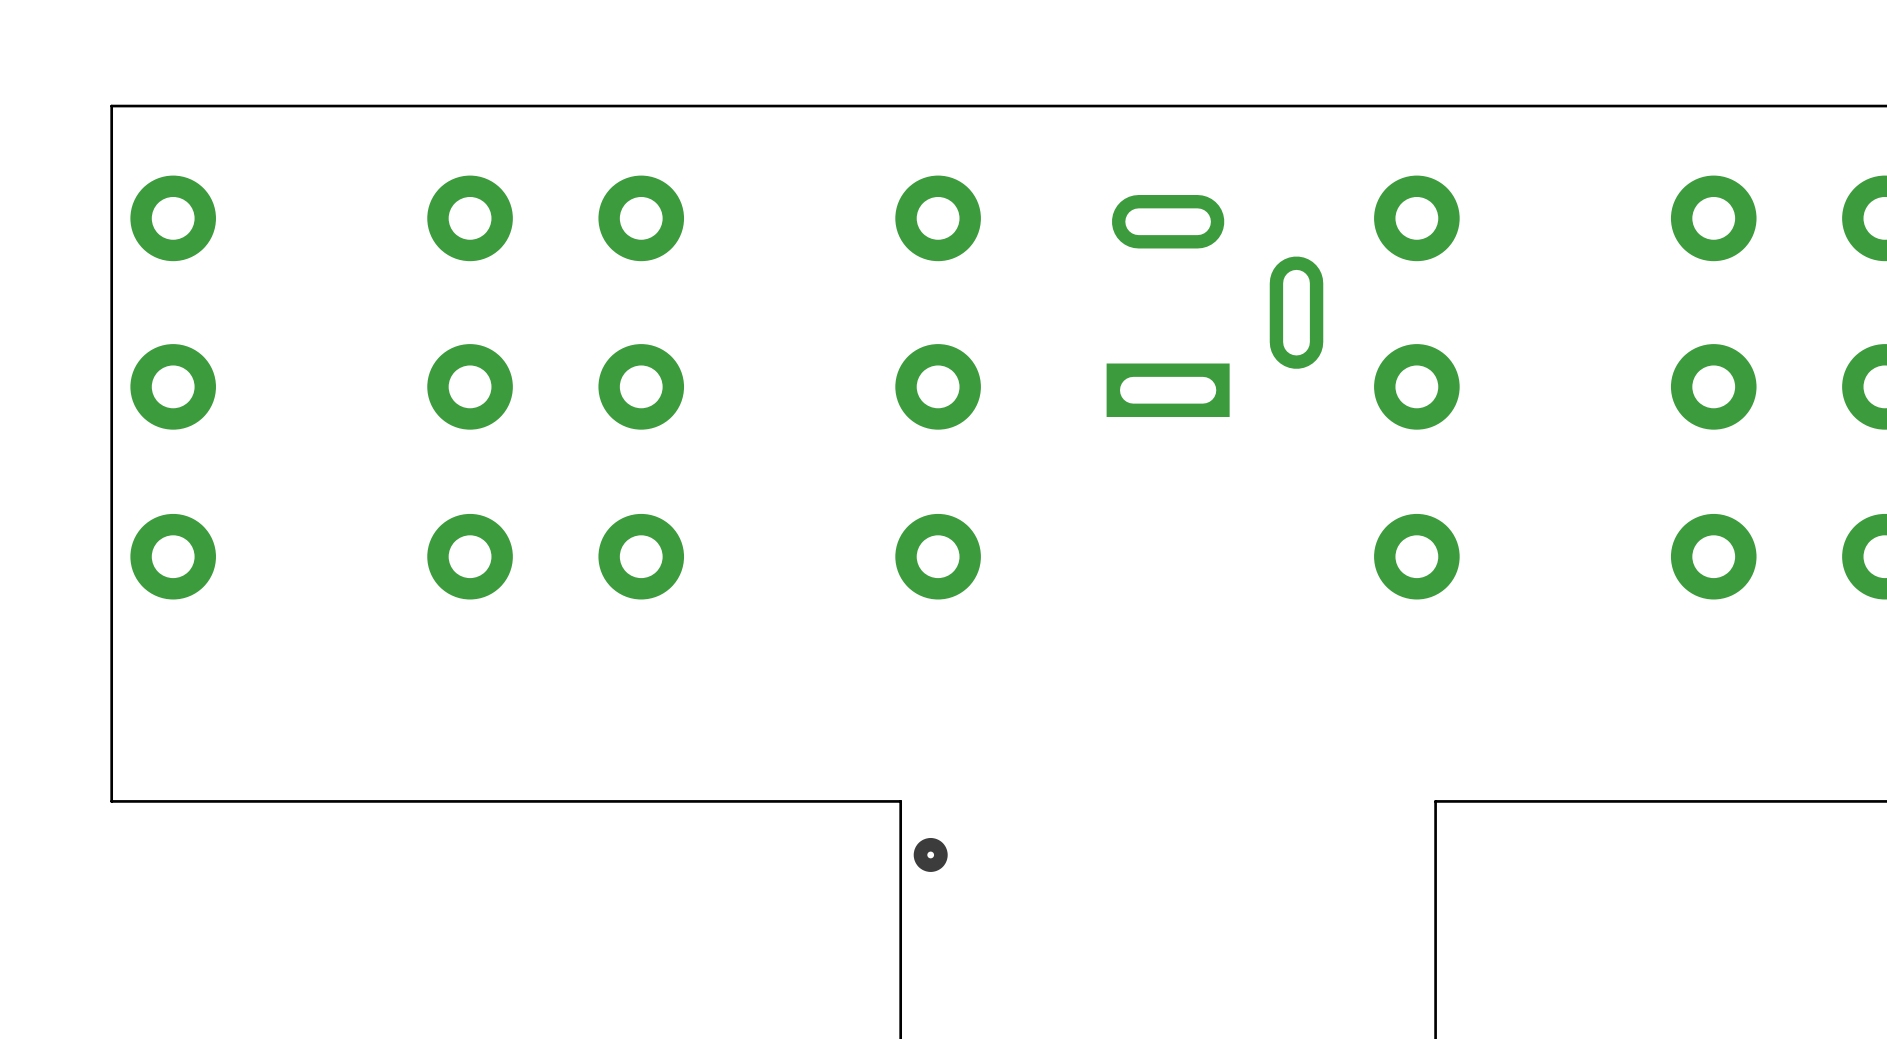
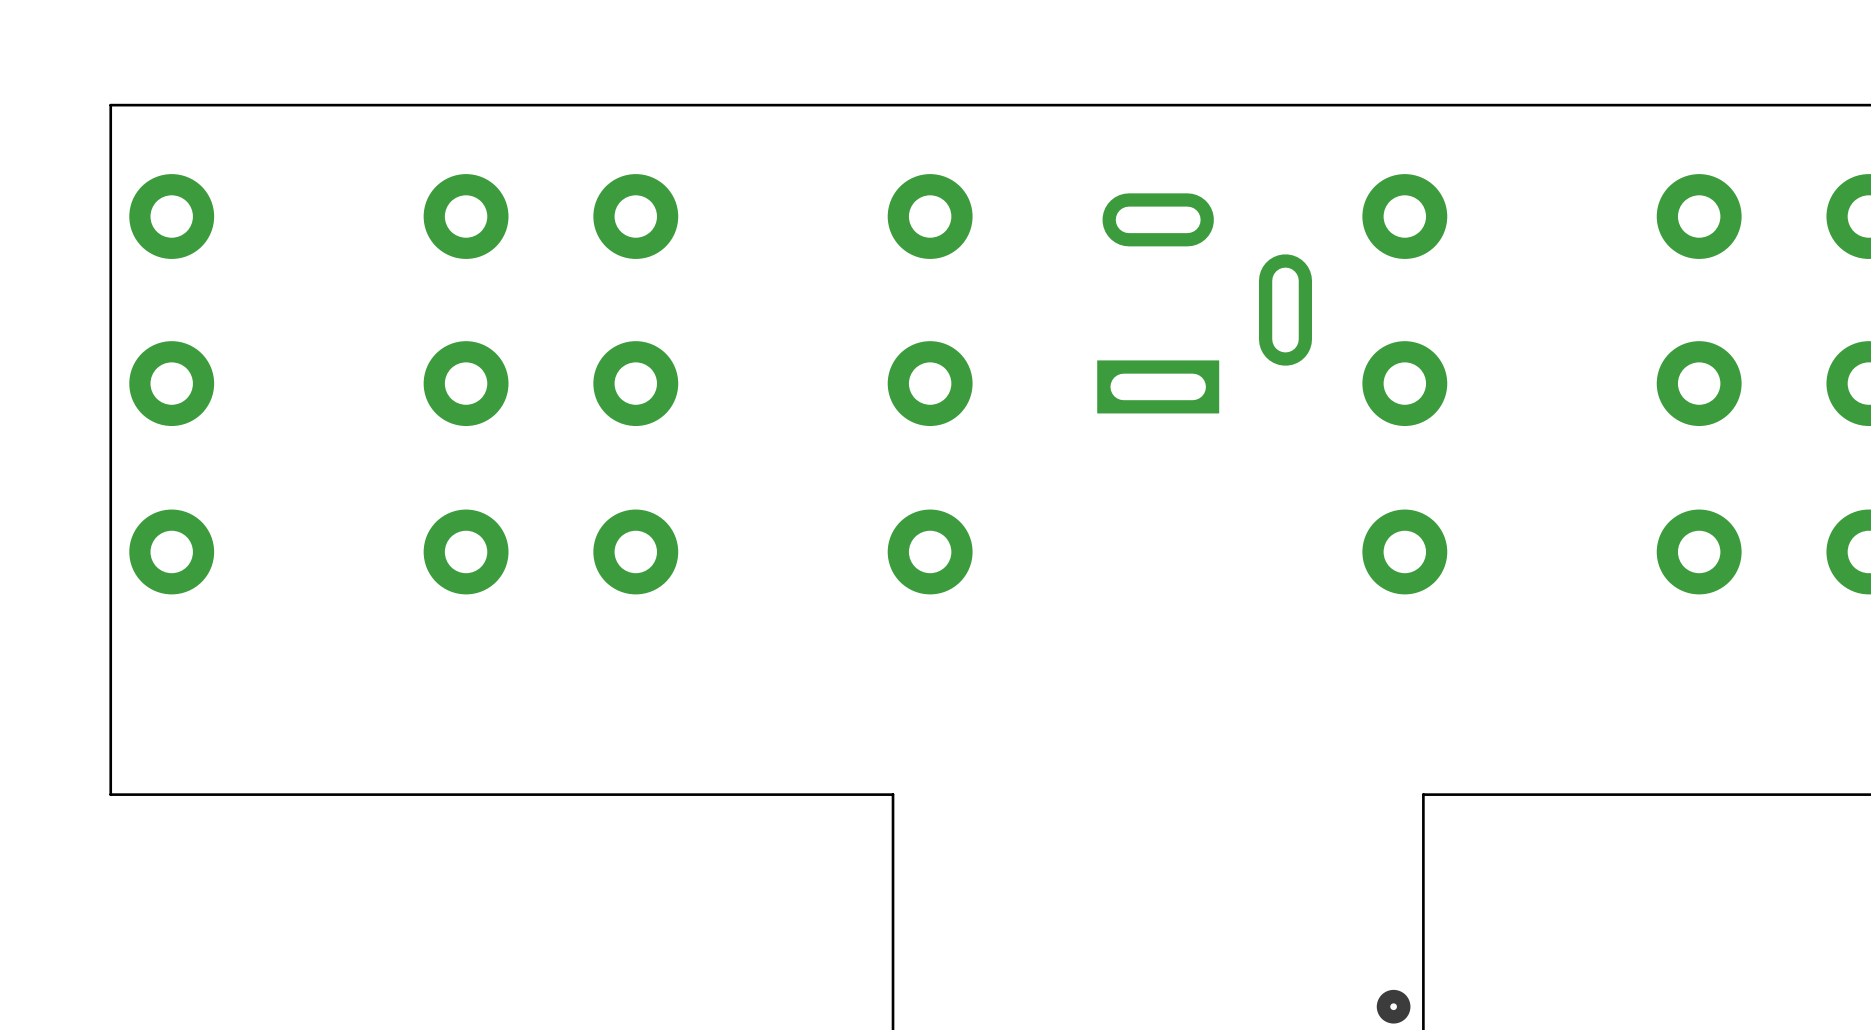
part position: (930, 854) -> (1393, 1006)

